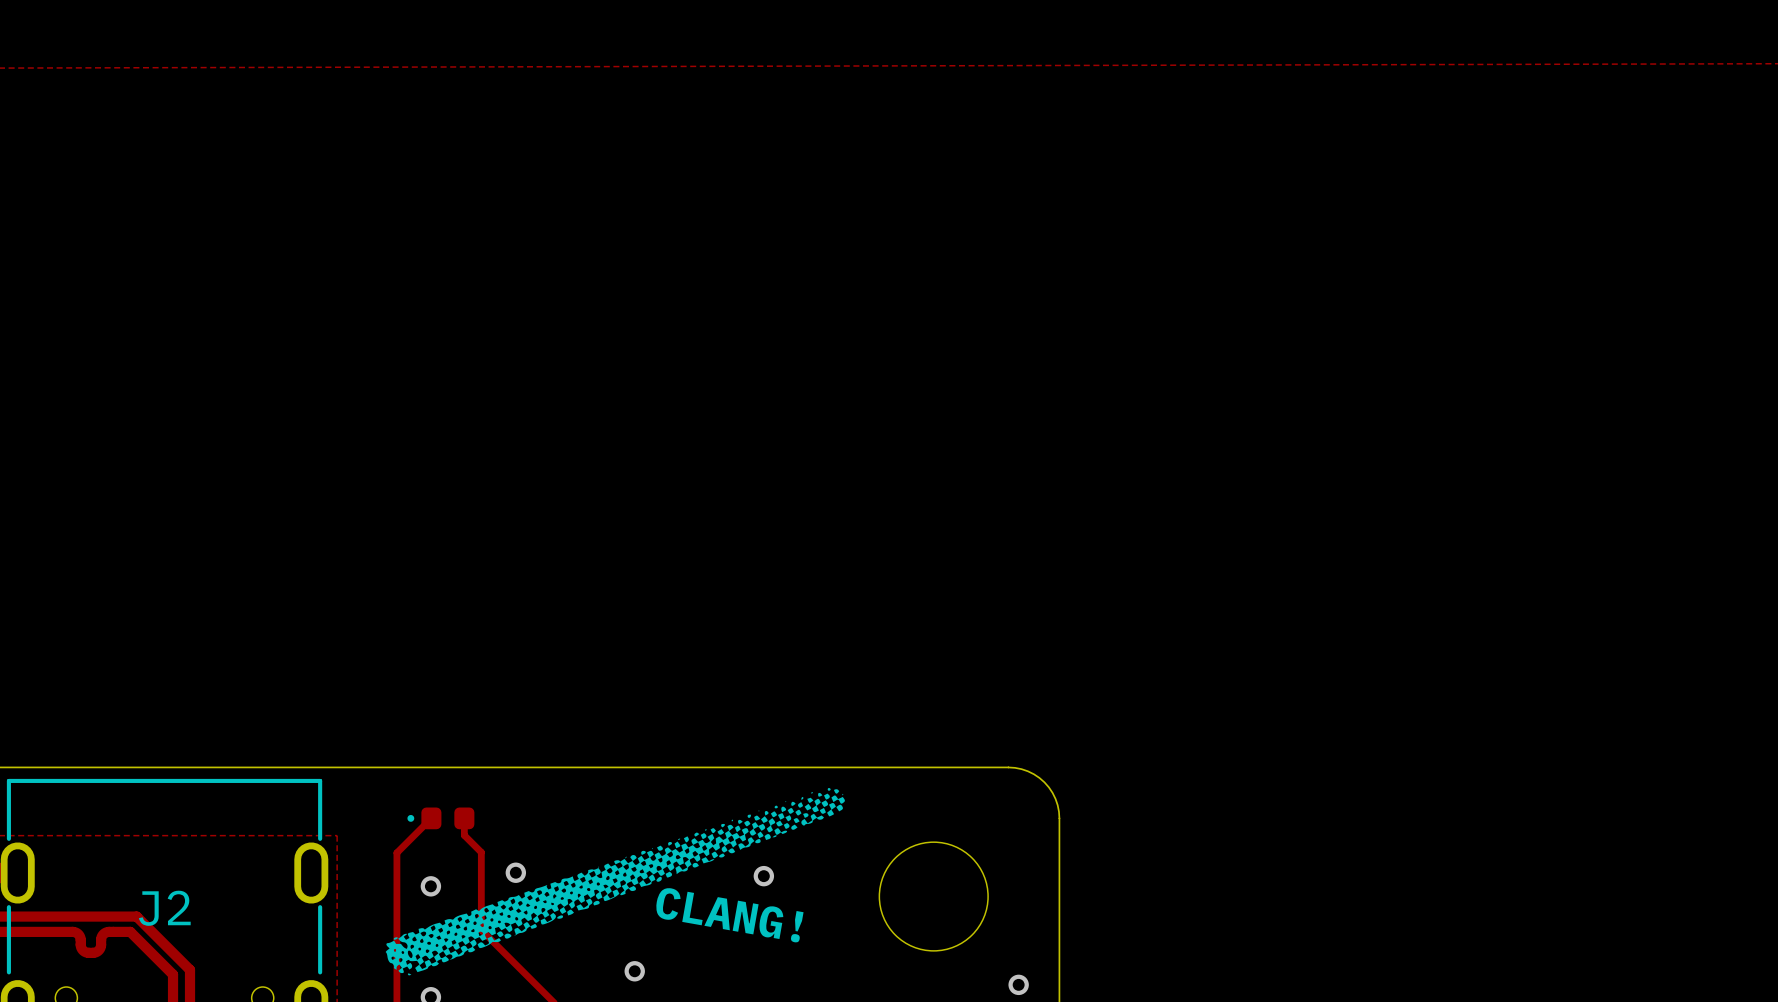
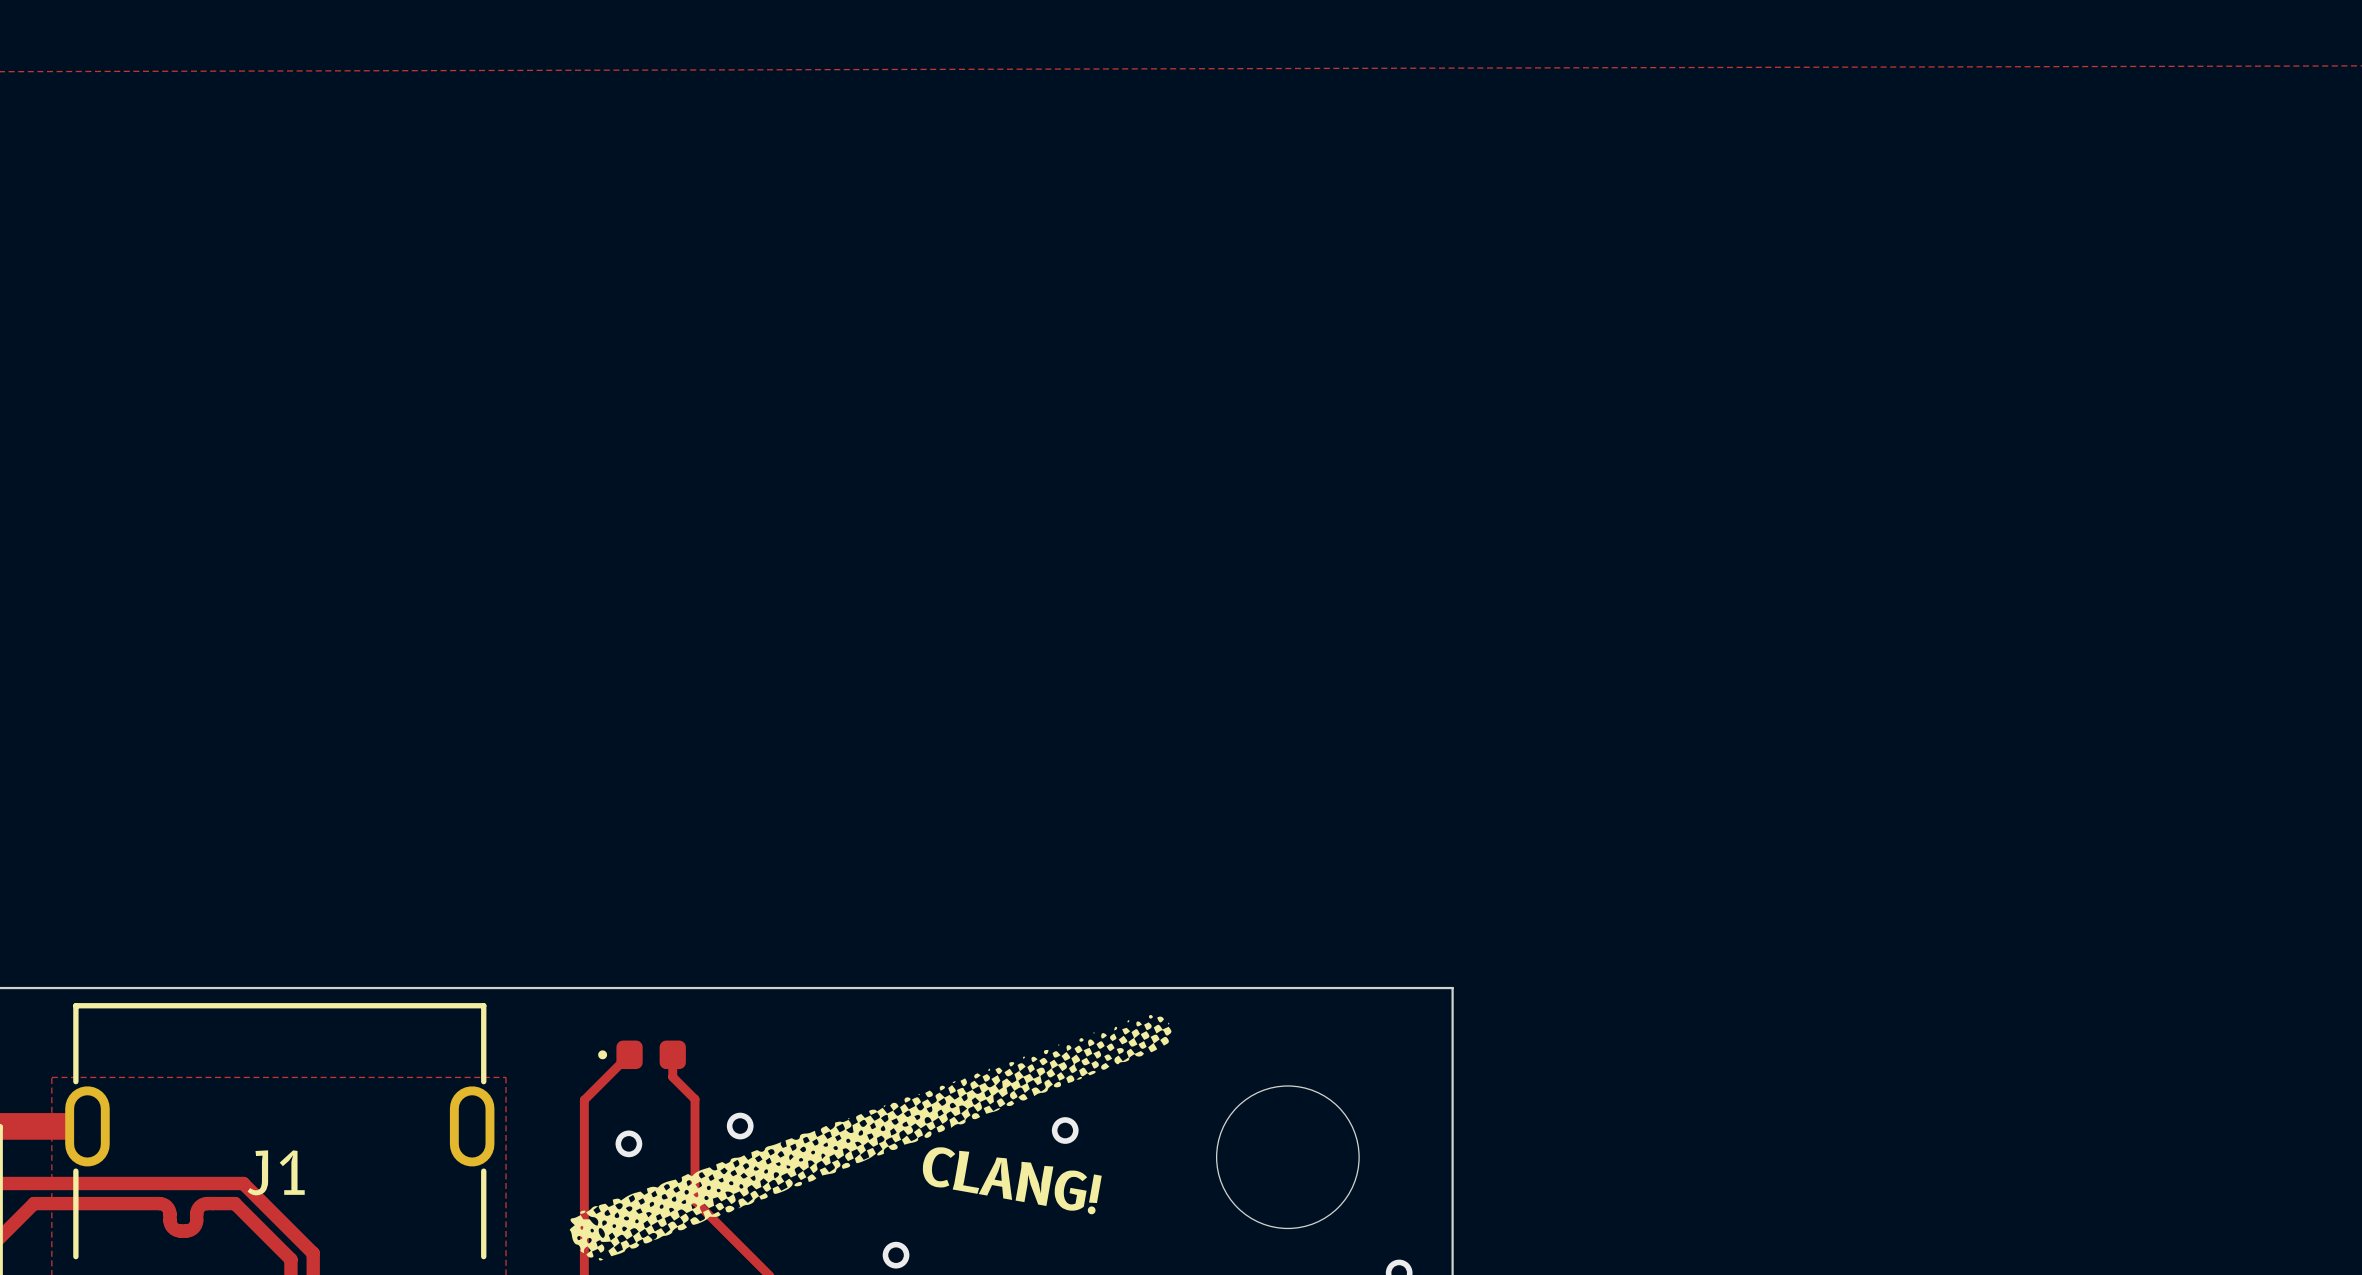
board edge: (1008, 767) (1027, 771) (1044, 782) (1055, 798) (1059, 818) -> (1385, 988) (1452, 988) (1452, 1054)
J2 name: J2 (164, 908) -> J1 (276, 1172)

